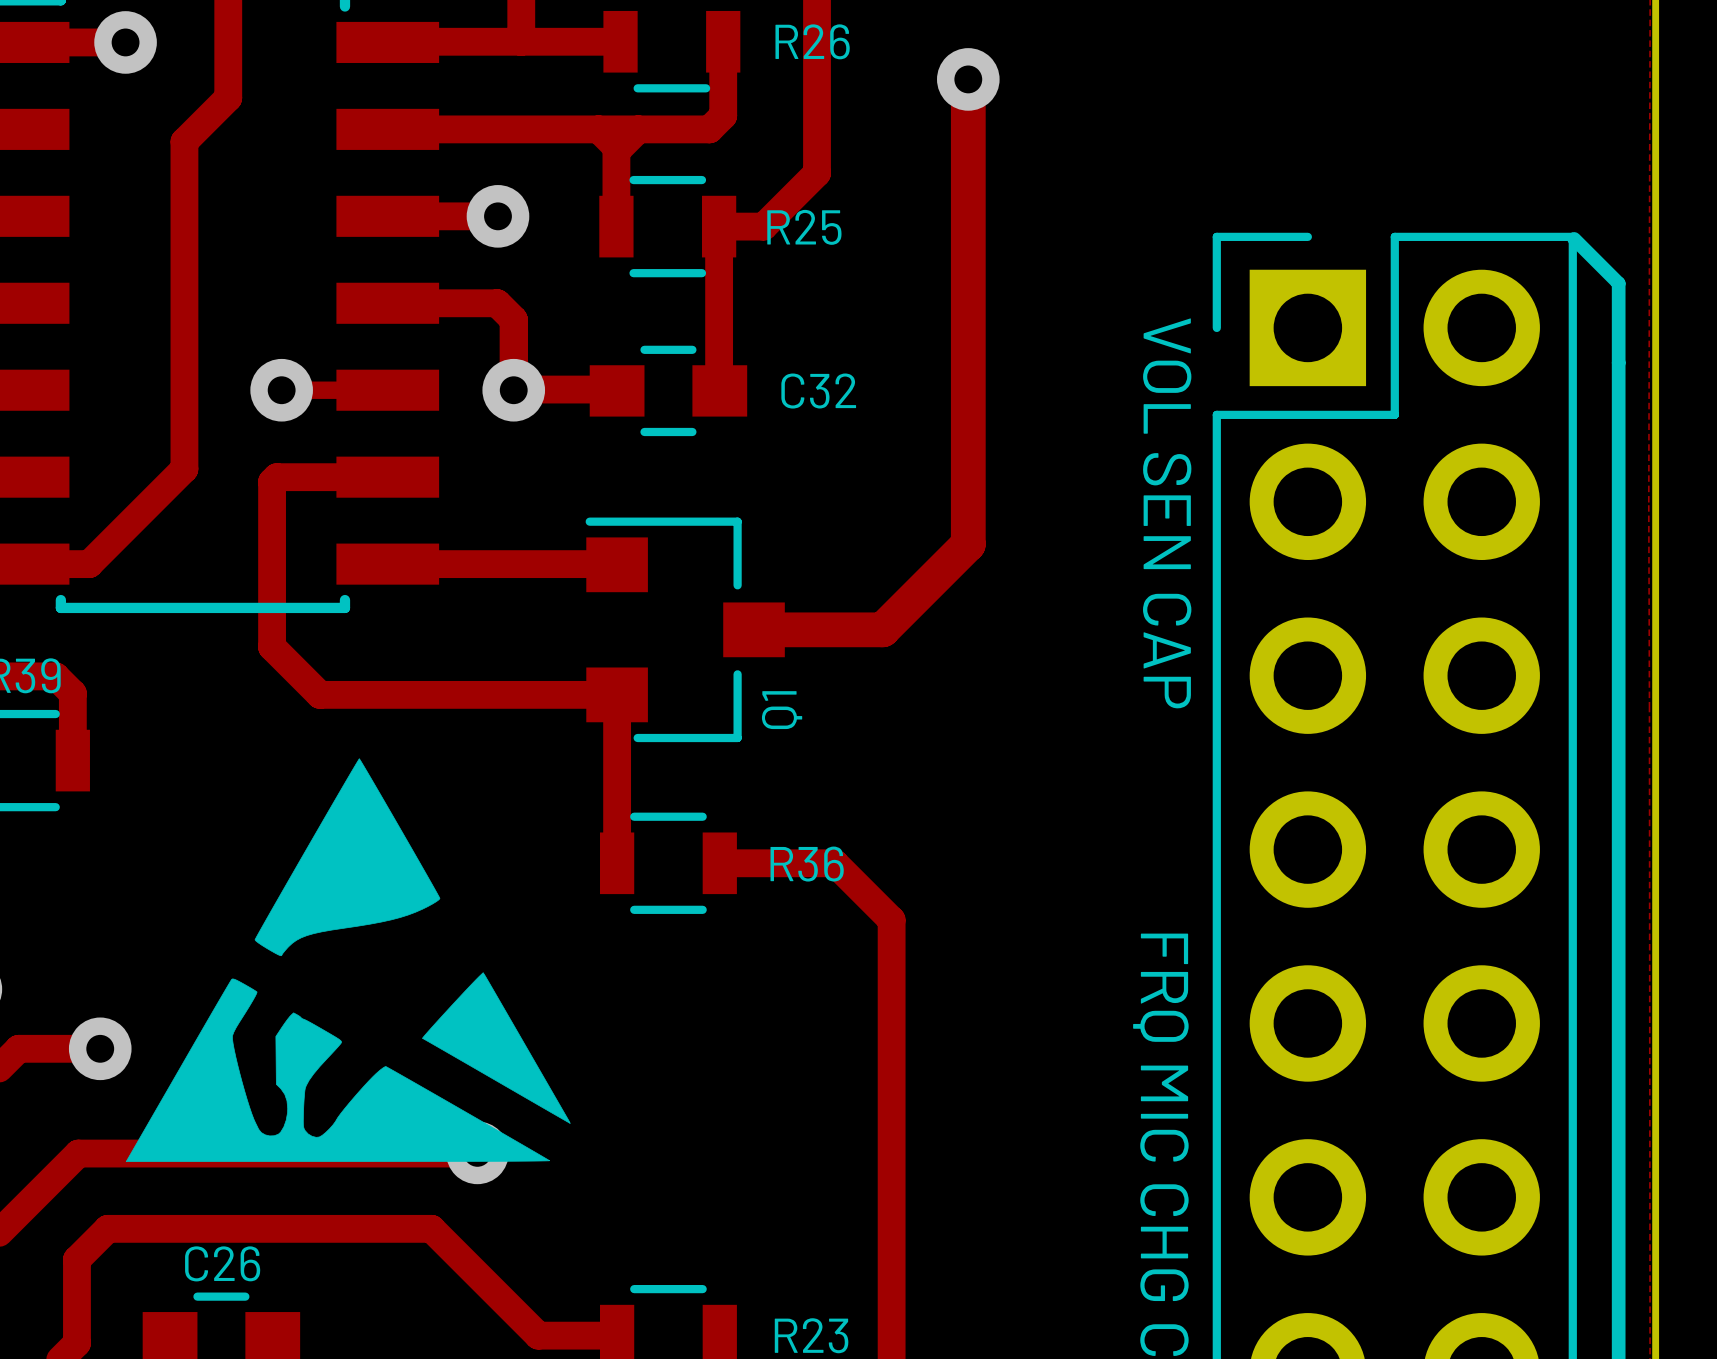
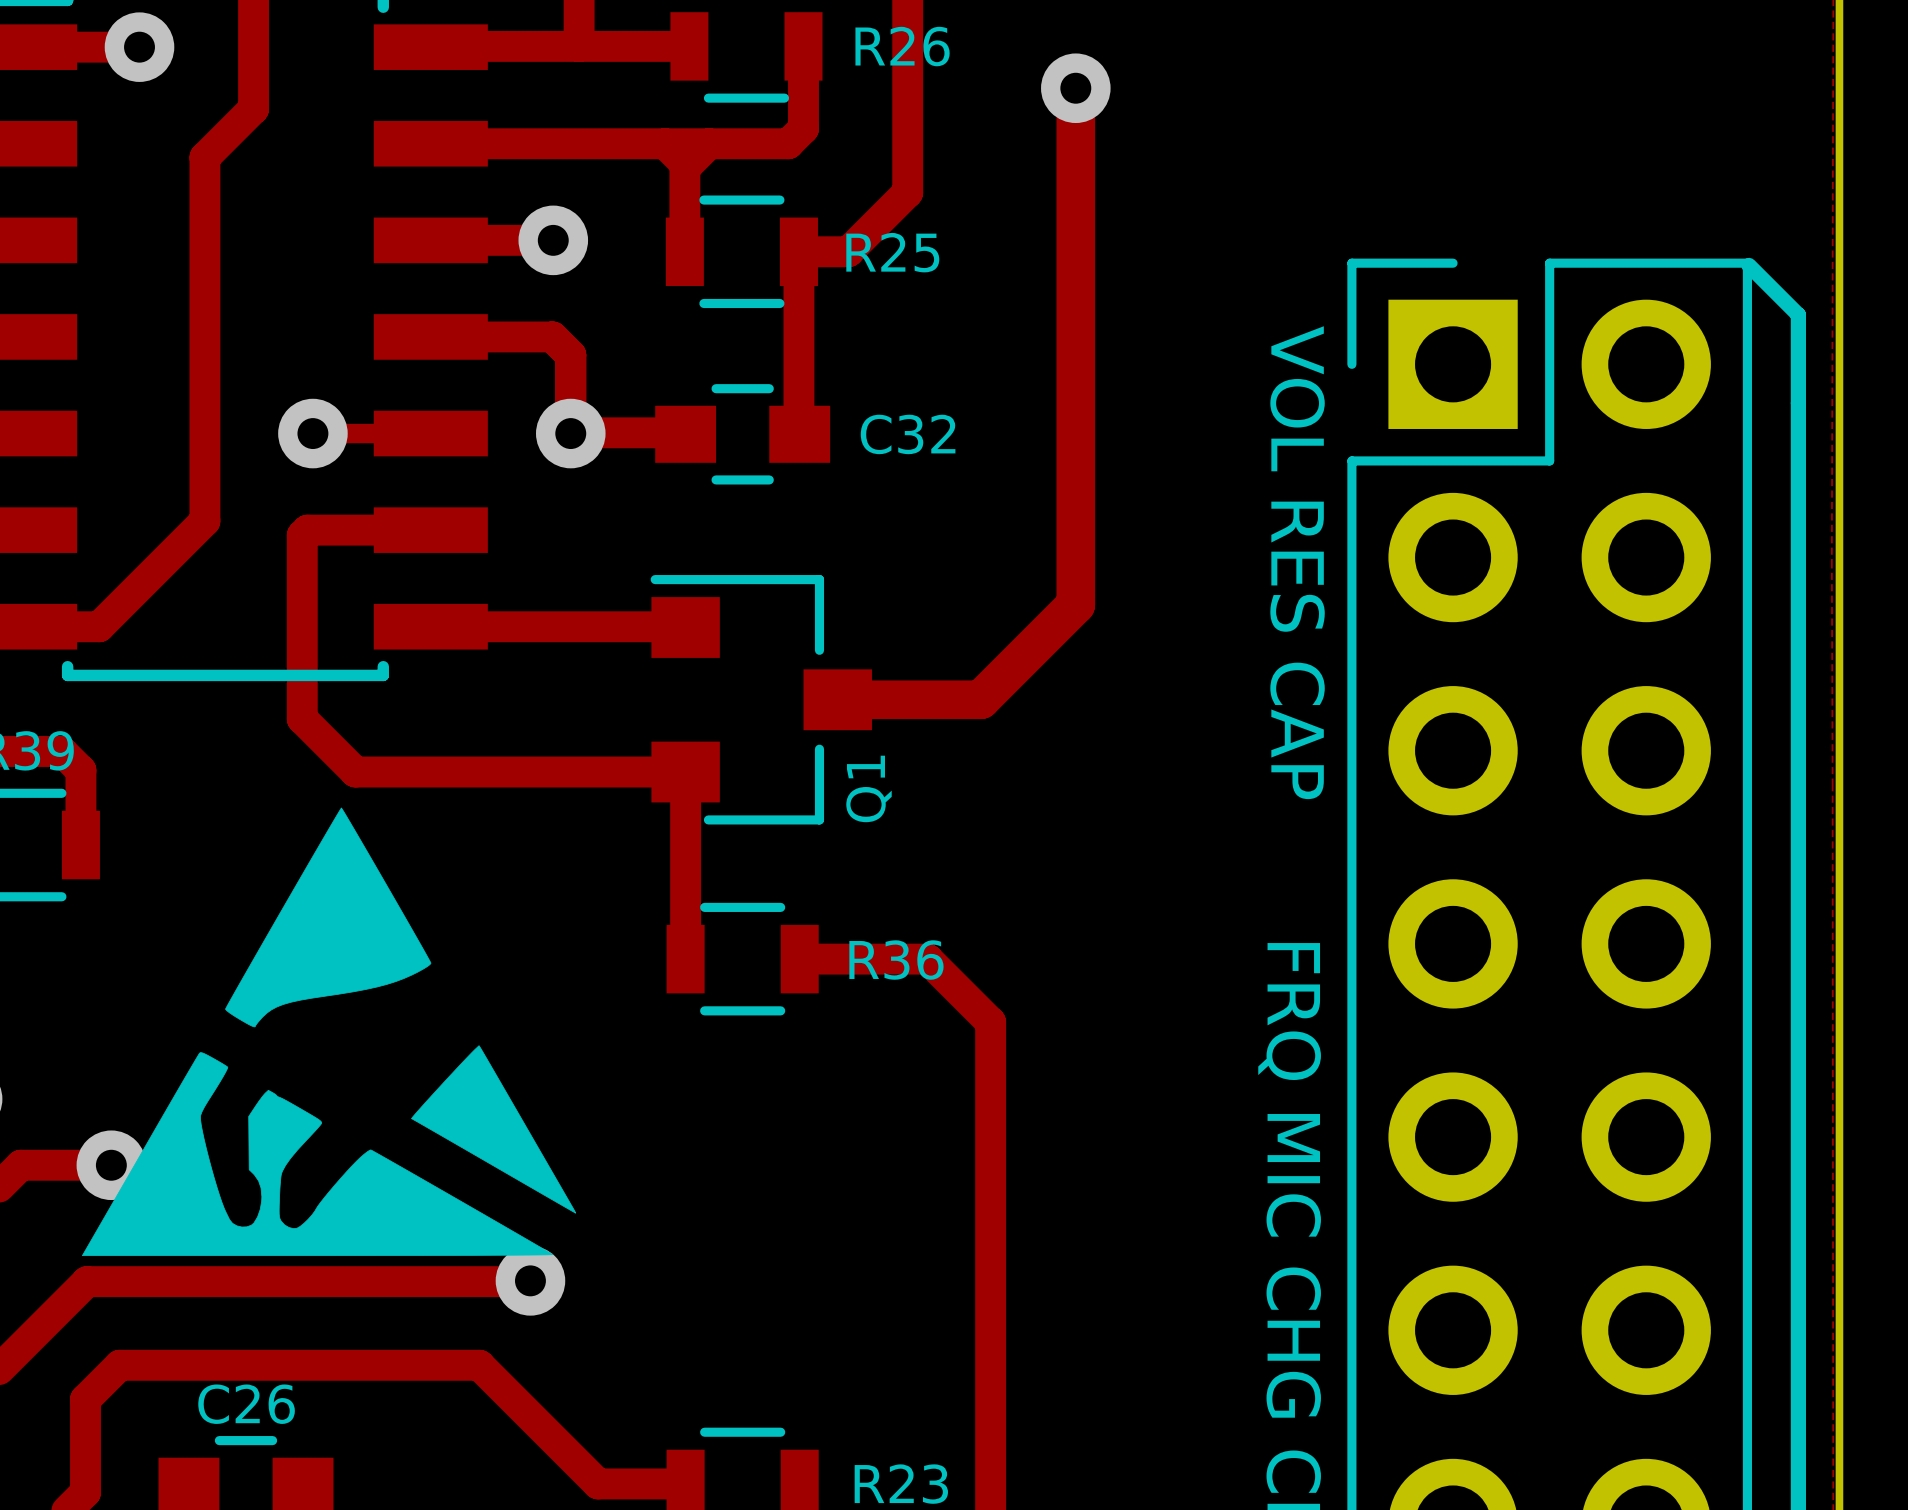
text: VOL SEN CAP (1167, 513) -> VOL RES CAP (1297, 562)
drawing position: (348, 960) -> (329, 1031)

